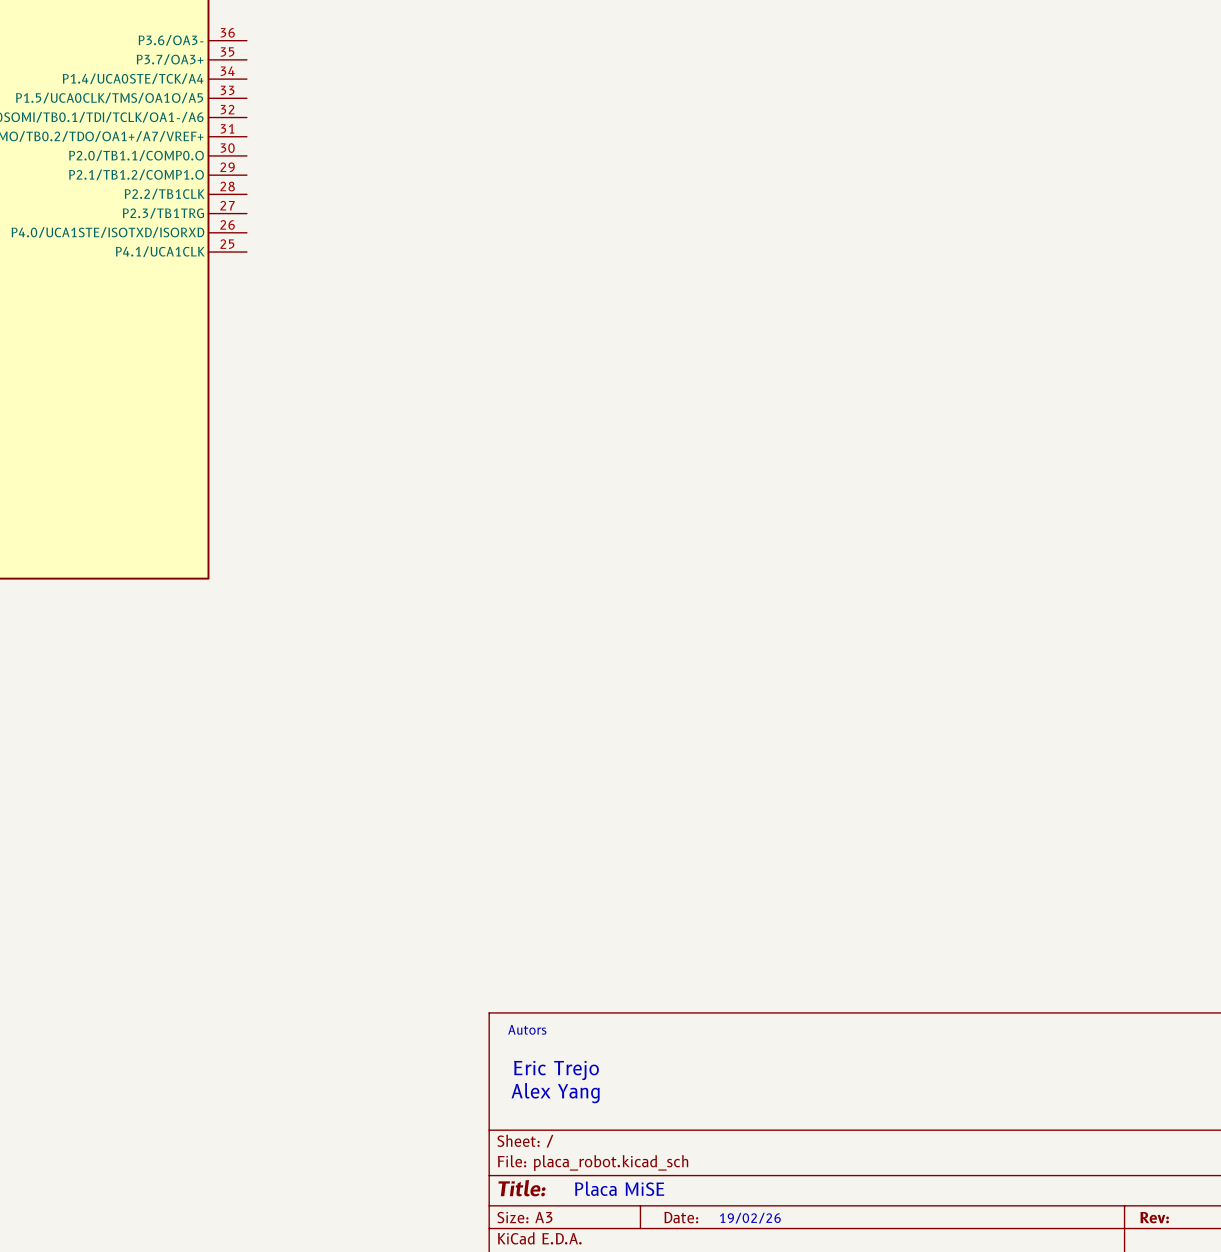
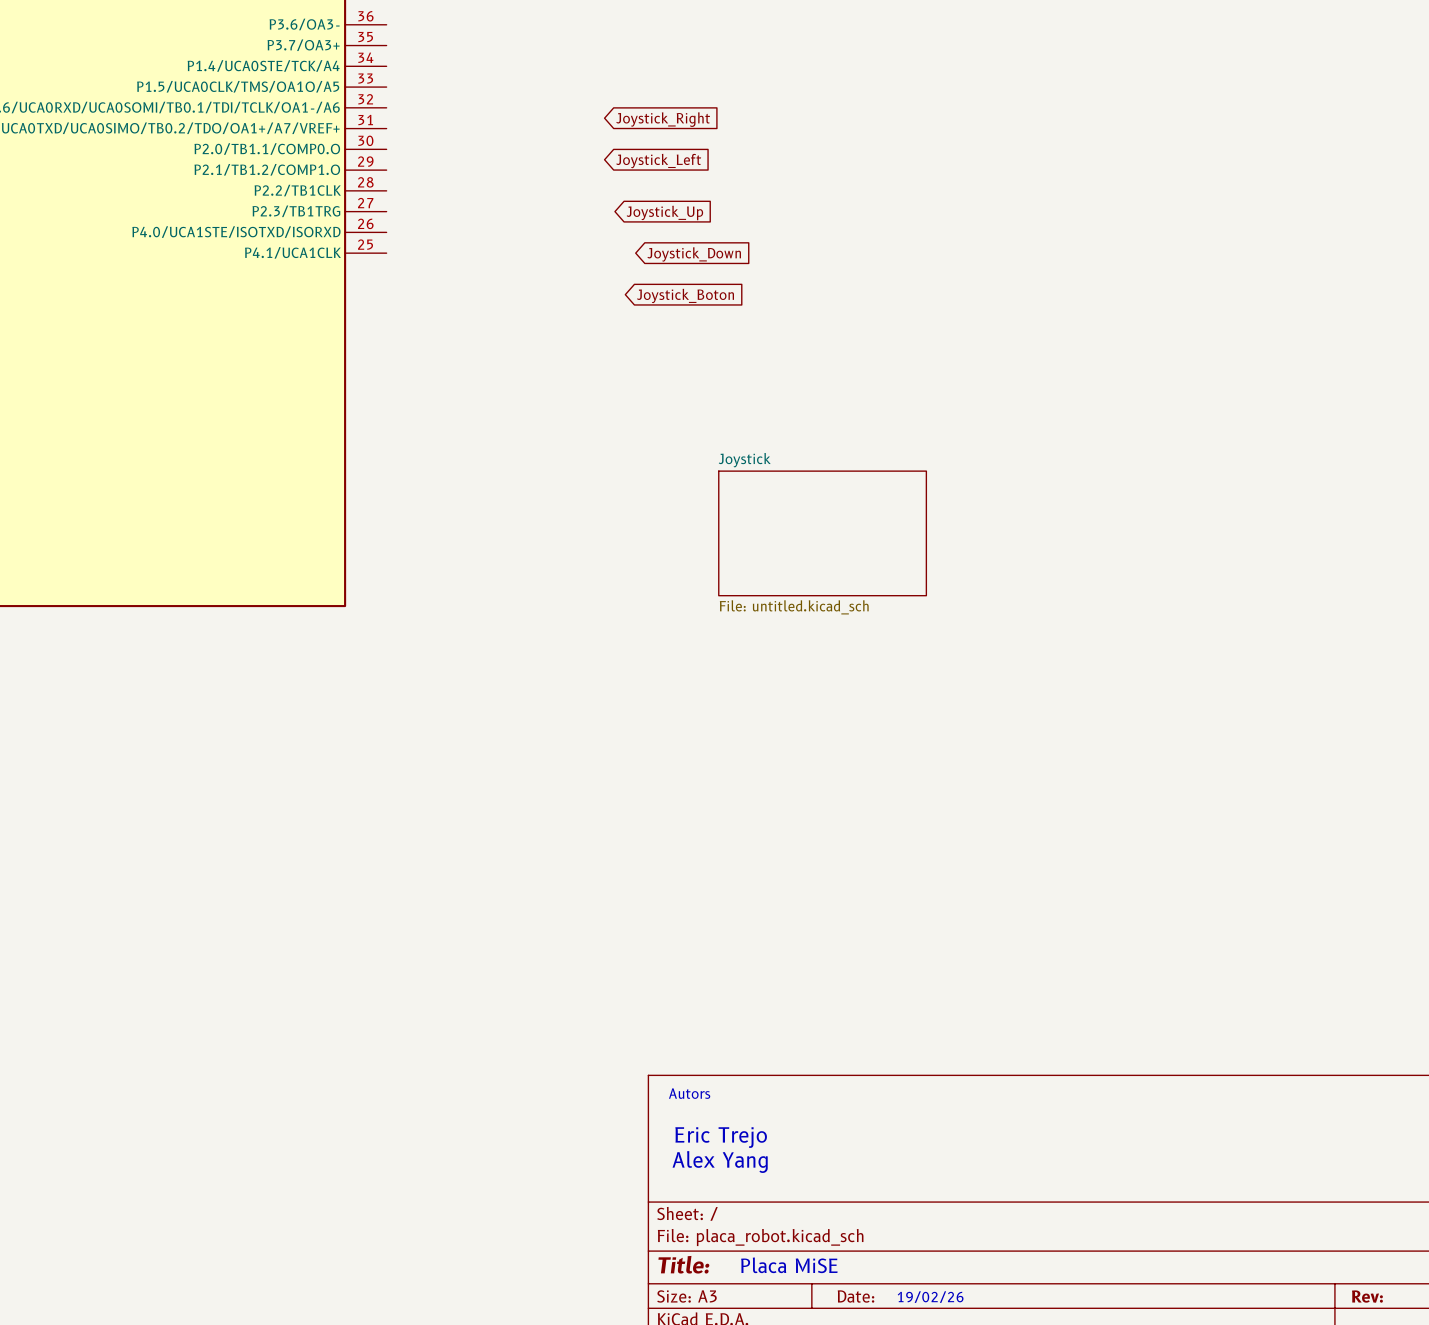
global label: none -> Joystick_Right (663, 119)
global label: none -> Joystick_Left (658, 161)
global label: none -> Joystick_Up (664, 212)
global label: none -> Joystick_Down (694, 254)
global label: none -> Joystick_Boton (685, 295)
sheet Joystick: none -> File: untitled.kicad_sch (822, 533)

